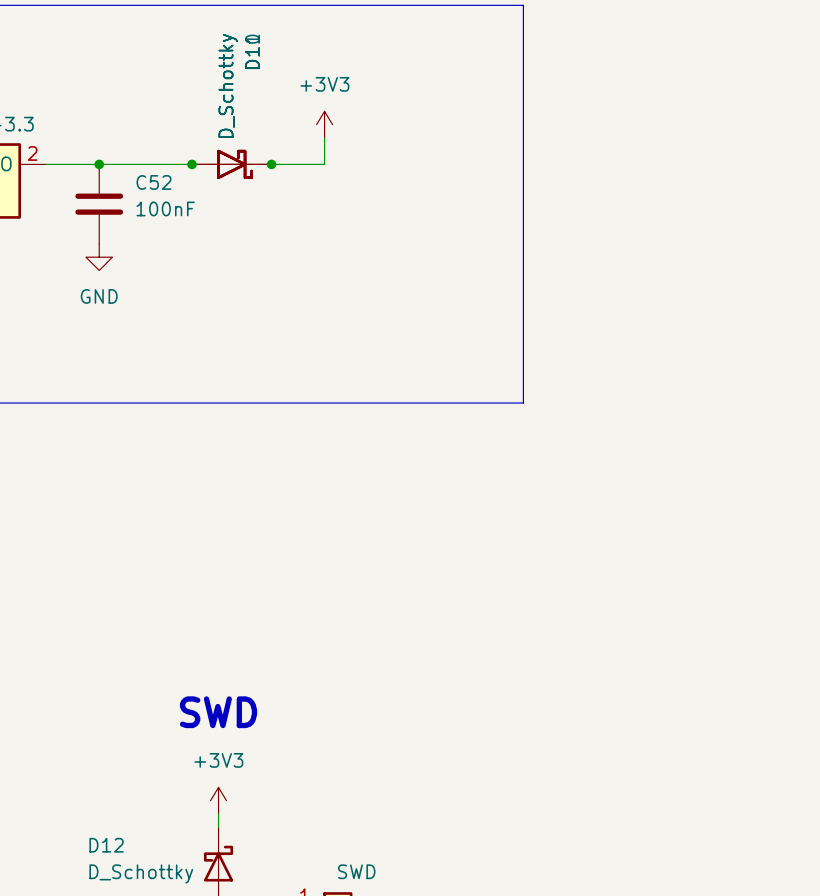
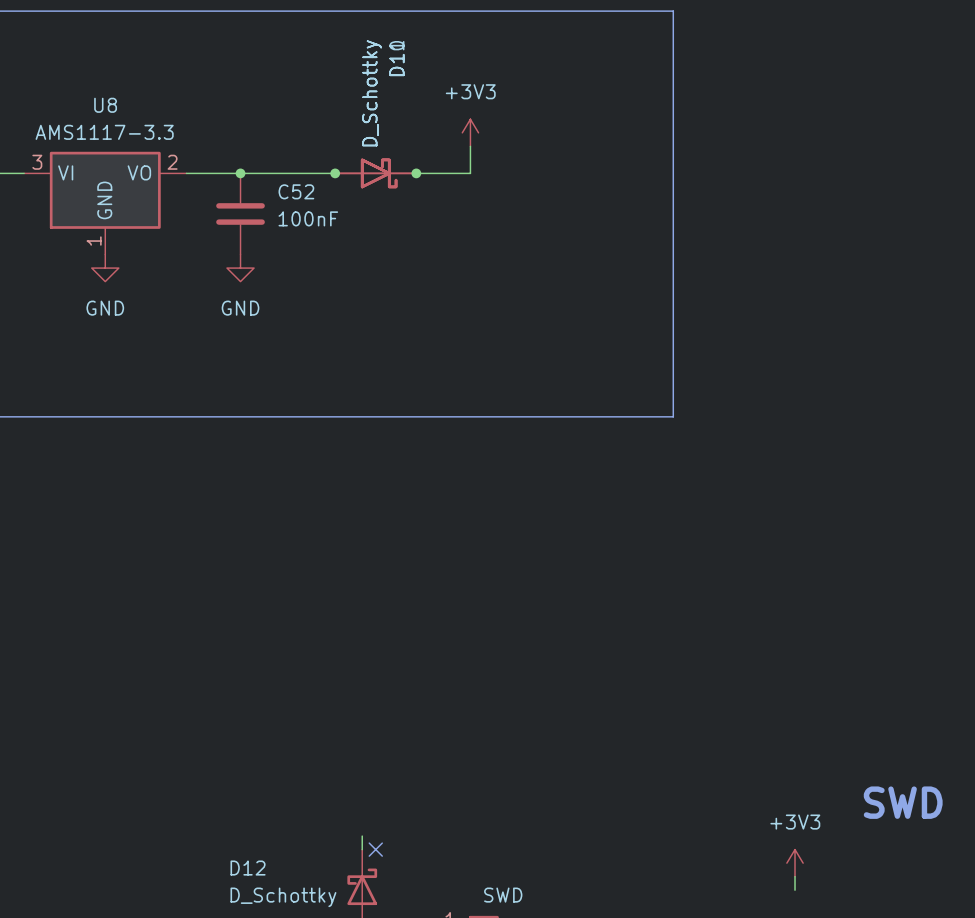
text: SWD (218, 712) -> none
text: none -> SWD (903, 802)
power symbol: +3V3 (218, 800) -> none
no-connect mark: none -> (375, 849)
power symbol: none -> +3V3 (795, 863)
wire: none -> (795, 876) (795, 890)

